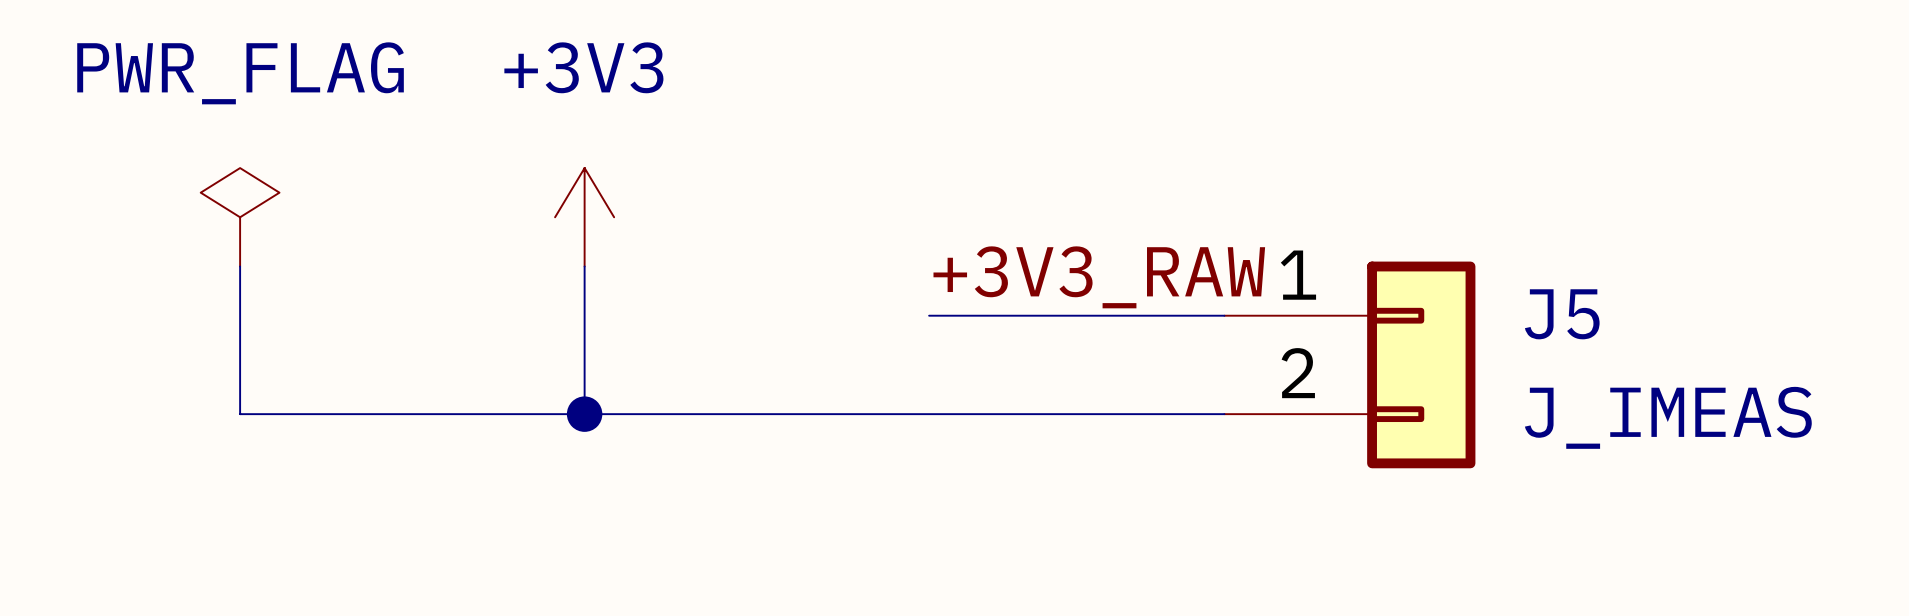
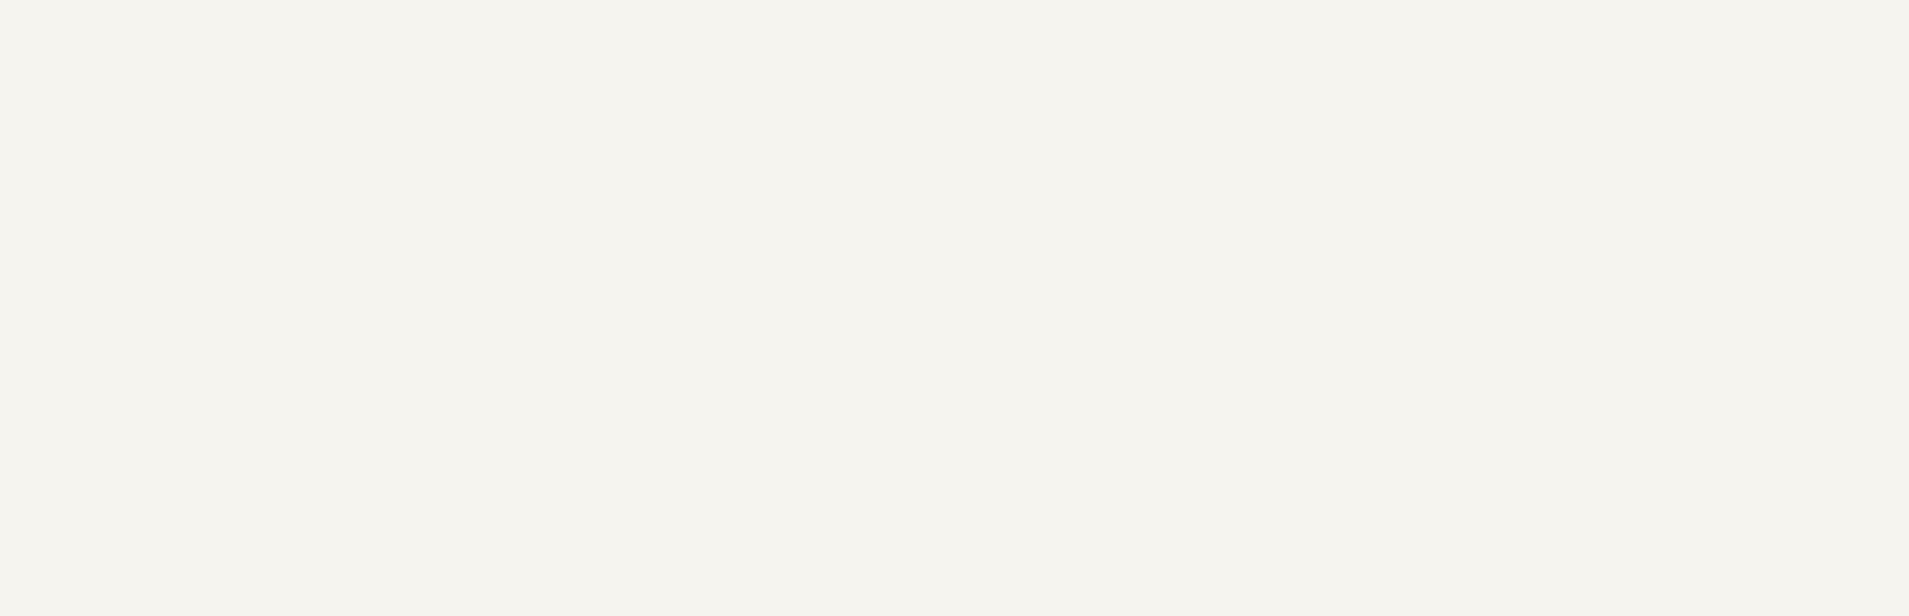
power symbol: PWR_FLAG (240, 217) -> none
power symbol: +3V3 (584, 217) -> none
wire: (240, 266) (240, 414) (1224, 414) -> none
wire: (584, 266) (584, 414) -> none
label: +3V3_RAW (1099, 277) -> none
wire: (929, 315) (1224, 315) -> none
J5: J_IMEAS (1349, 364) -> none
junction: (584, 414) -> none

